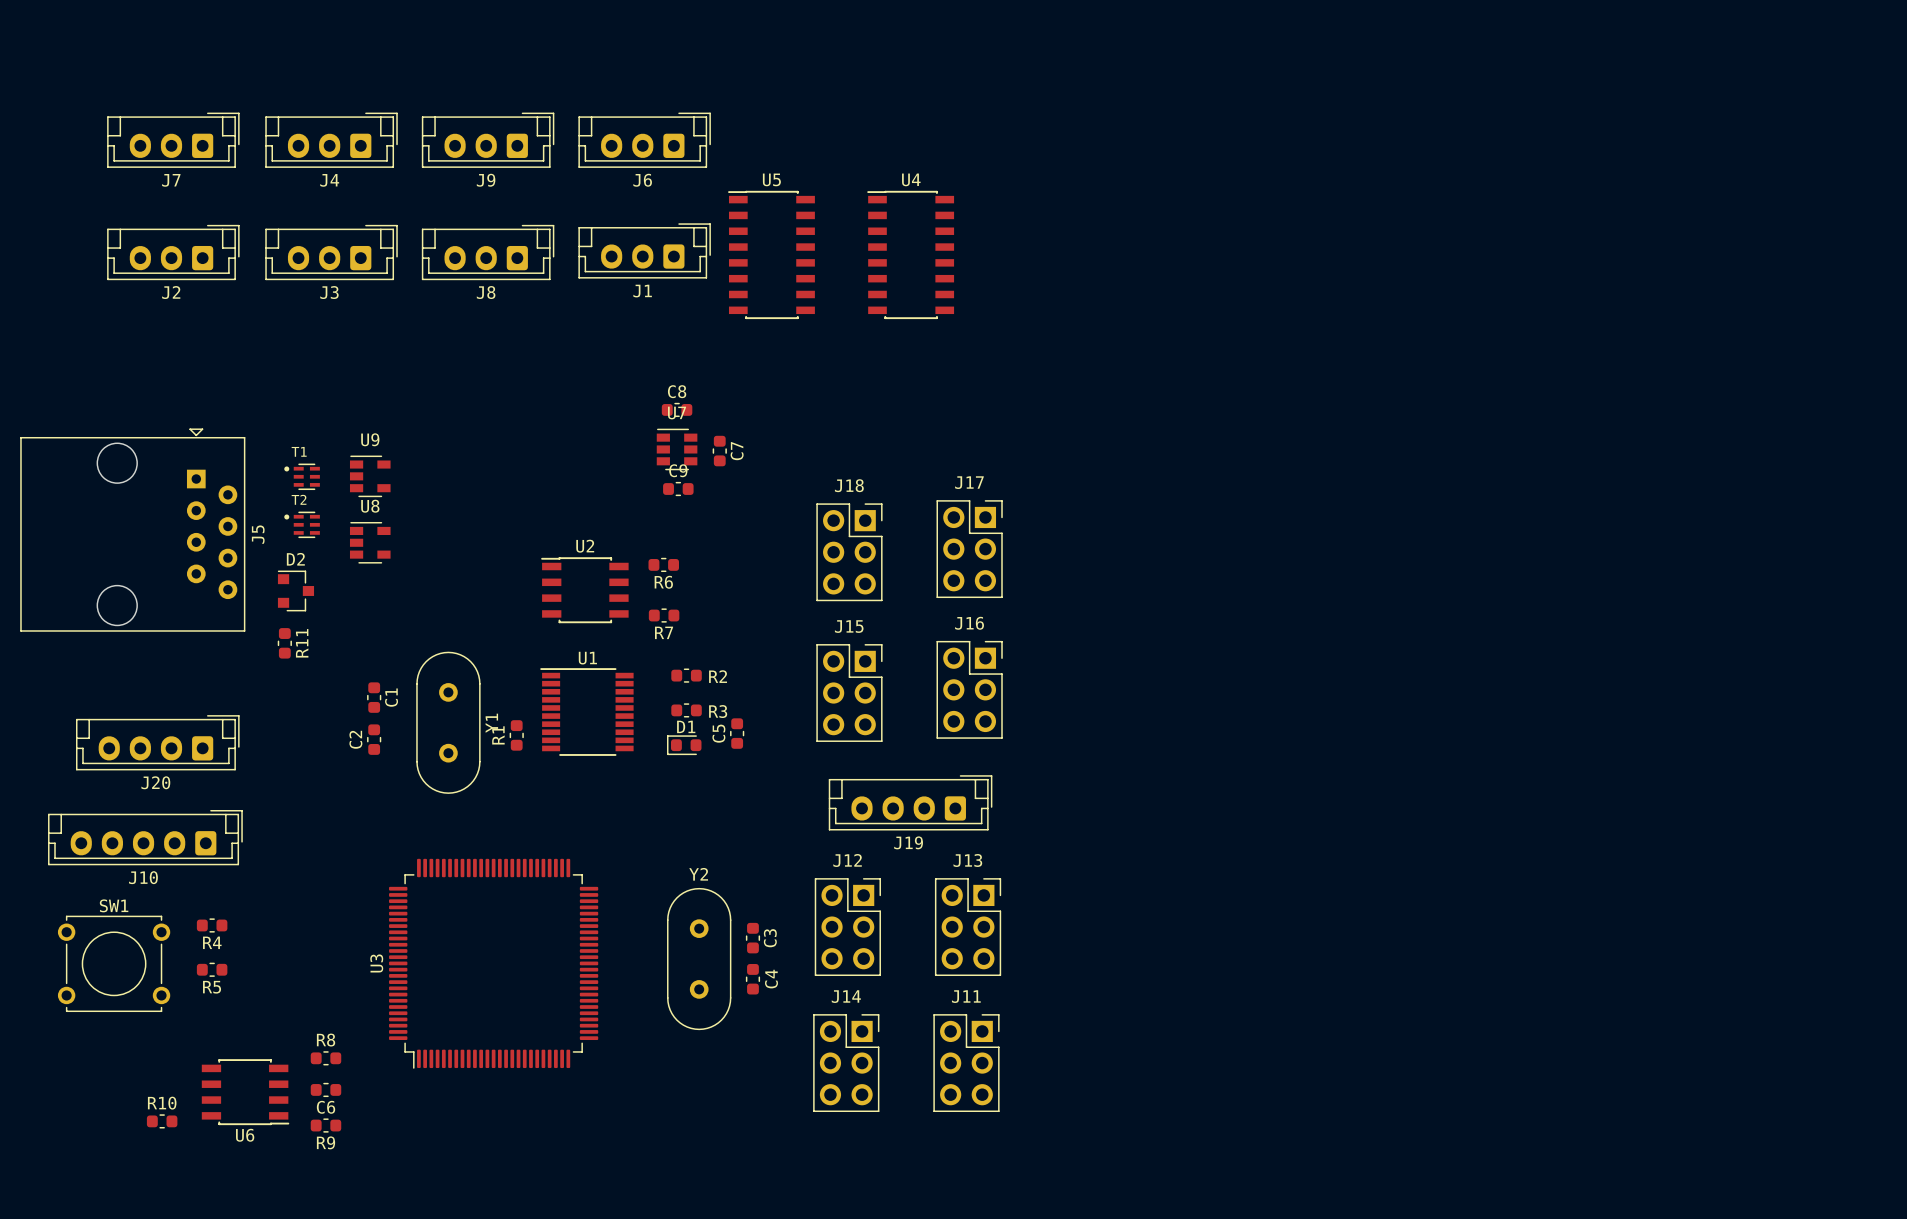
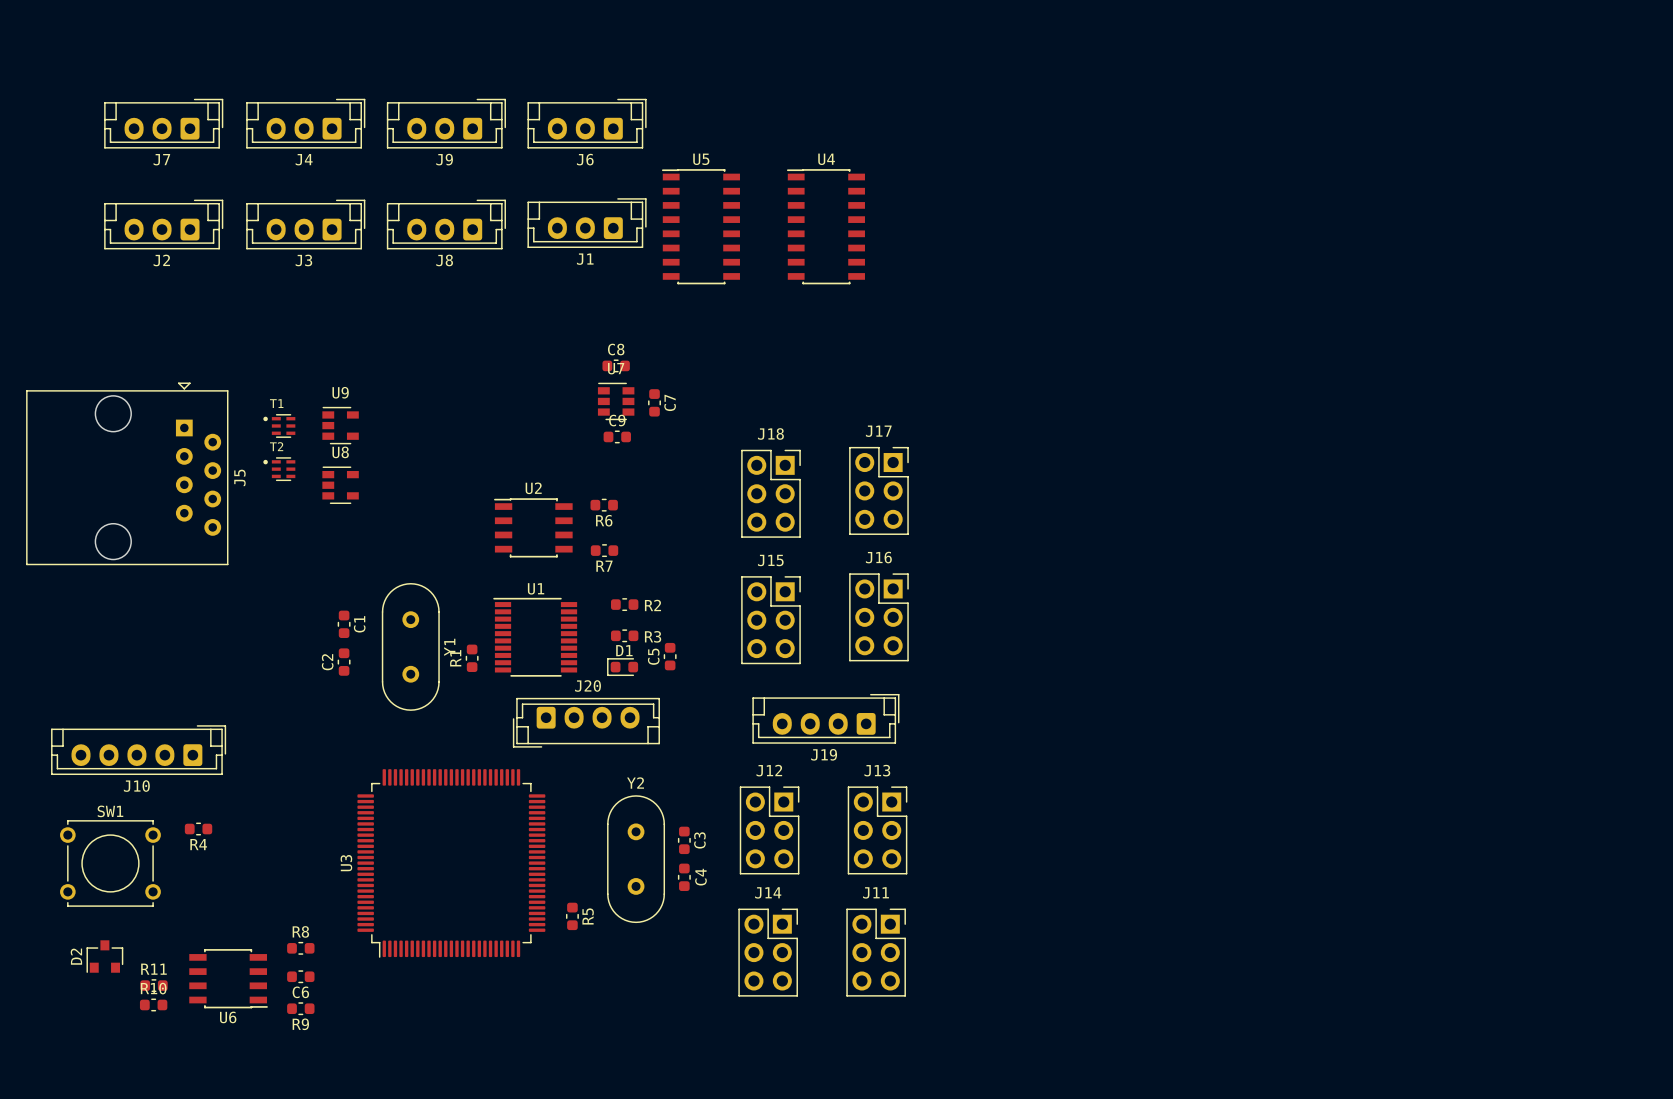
D2 rotation: 0° (295, 590) -> 90° counterclockwise (104, 956)
D2 position: (295, 590) -> (104, 956)
R11 rotation: 0° (284, 643) -> 90° clockwise (153, 985)
R11 position: (284, 643) -> (153, 985)
R11 name position: R11 (302, 643) -> R11 (153, 969)
J20 rotation: 0° (157, 742) -> 180° (586, 722)
J20 position: (157, 742) -> (586, 722)
R5 rotation: 0° (212, 969) -> 90° clockwise (572, 916)
R5 position: (212, 969) -> (572, 916)
R5 name position: R5 (212, 987) -> R5 (588, 916)

